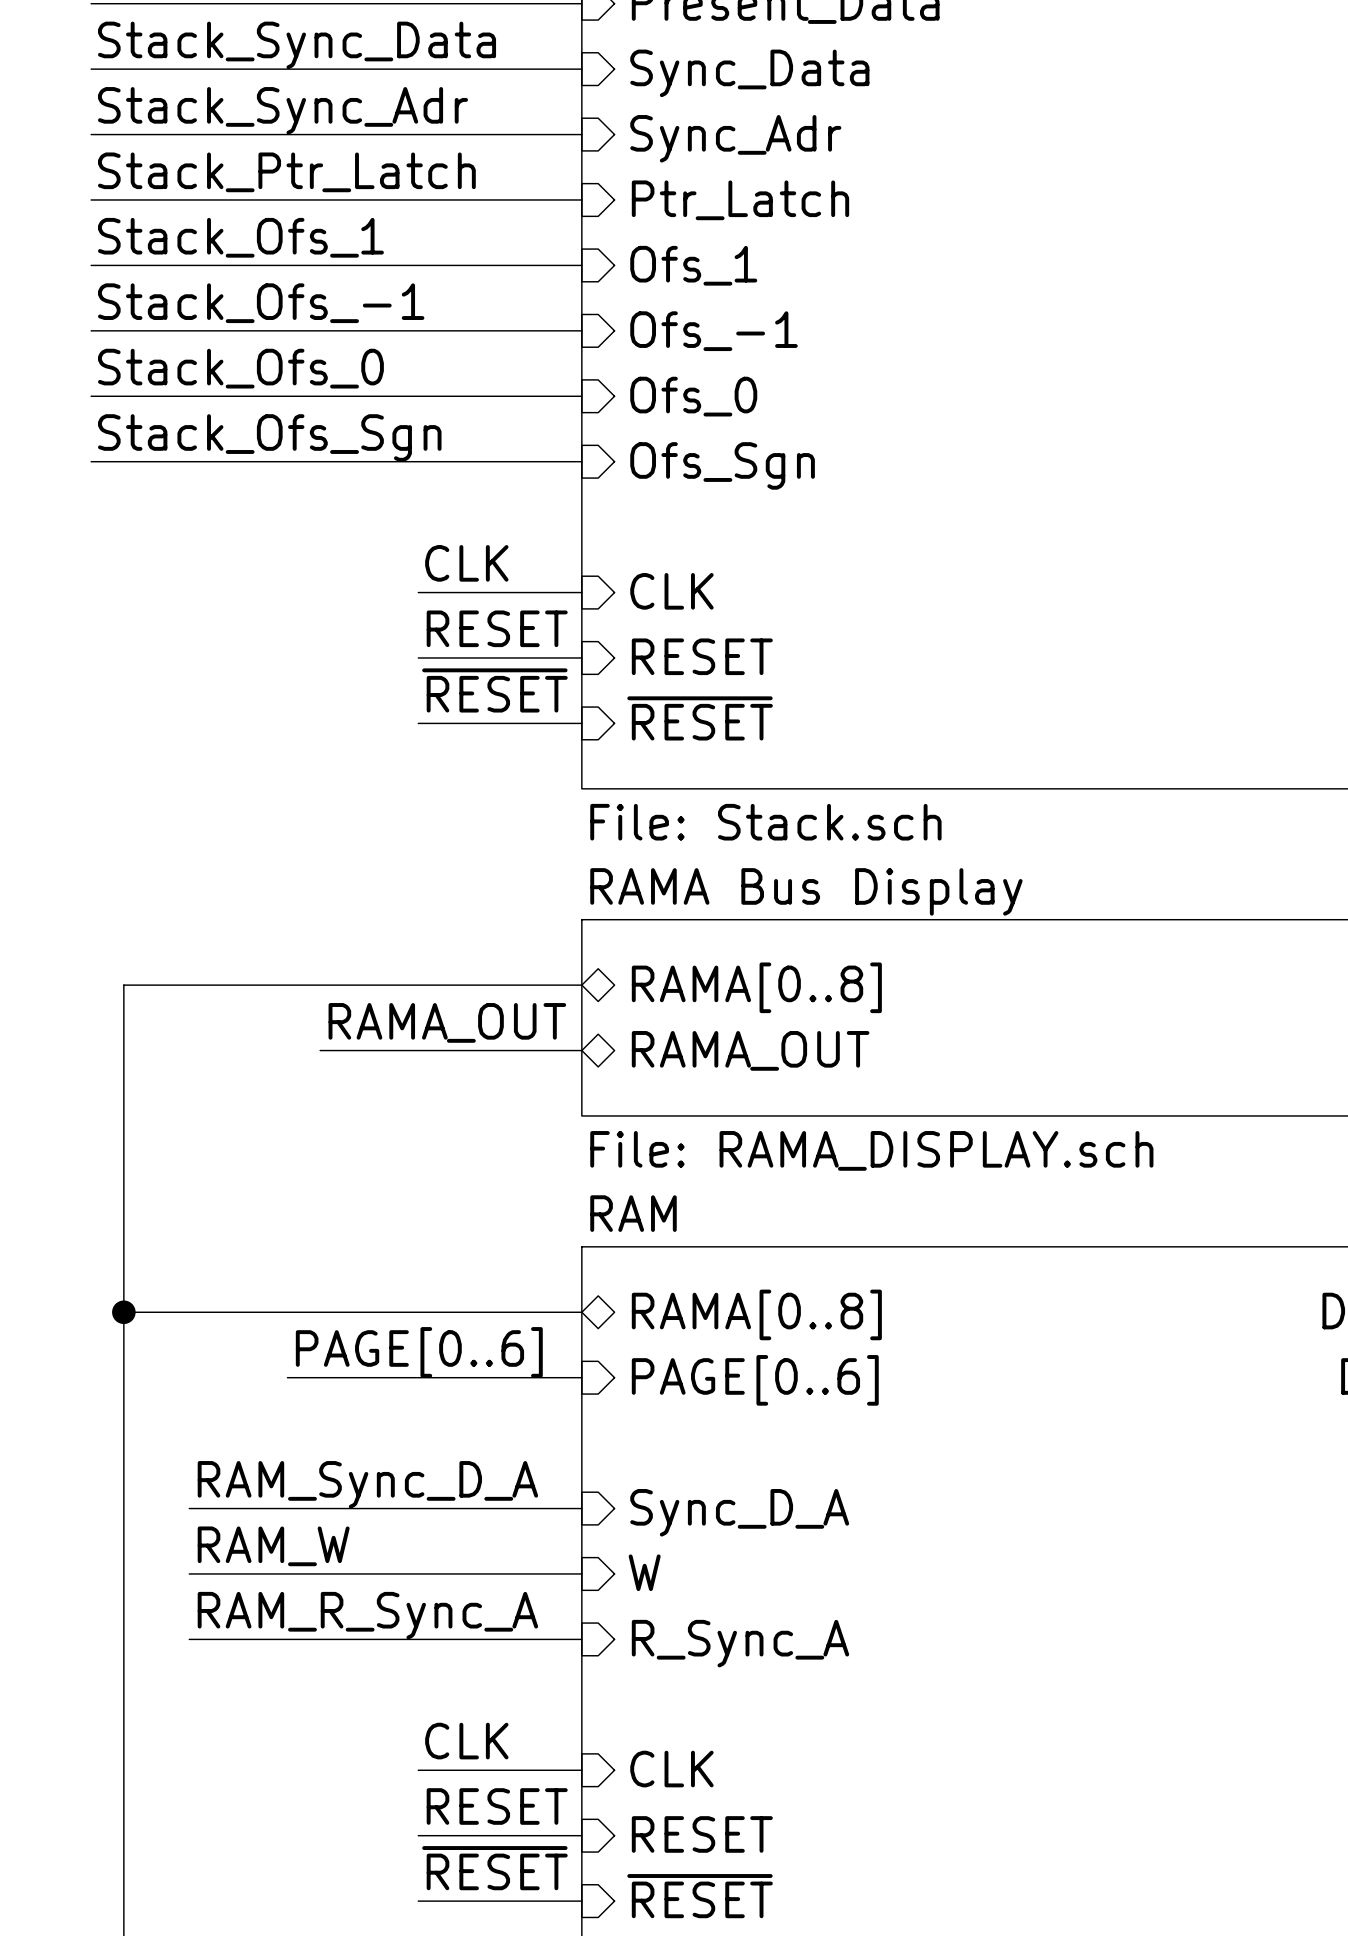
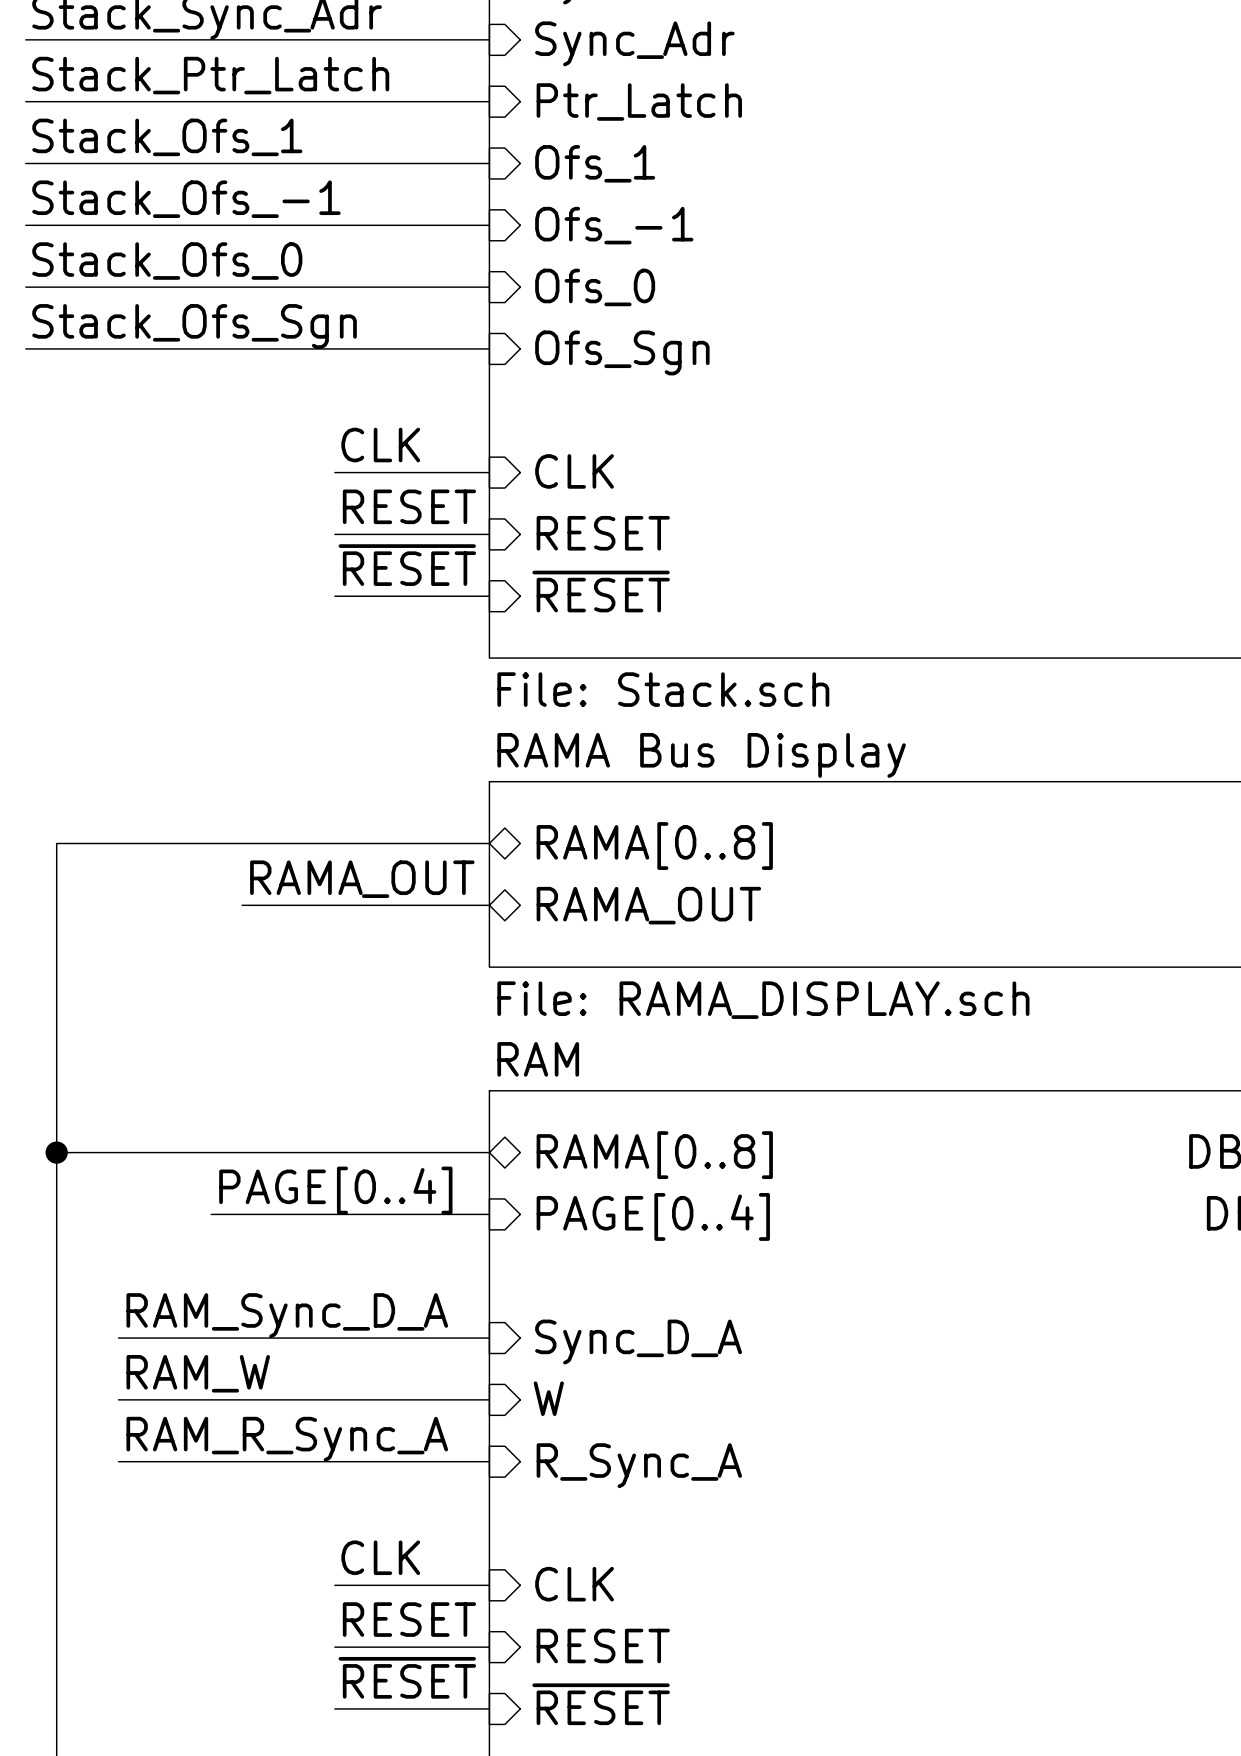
label: PAGE[0..6] (419, 1352) -> PAGE[0..4] (335, 1190)
sheet pin: PAGE[0..6] (755, 1380) -> PAGE[0..4] (653, 1216)

